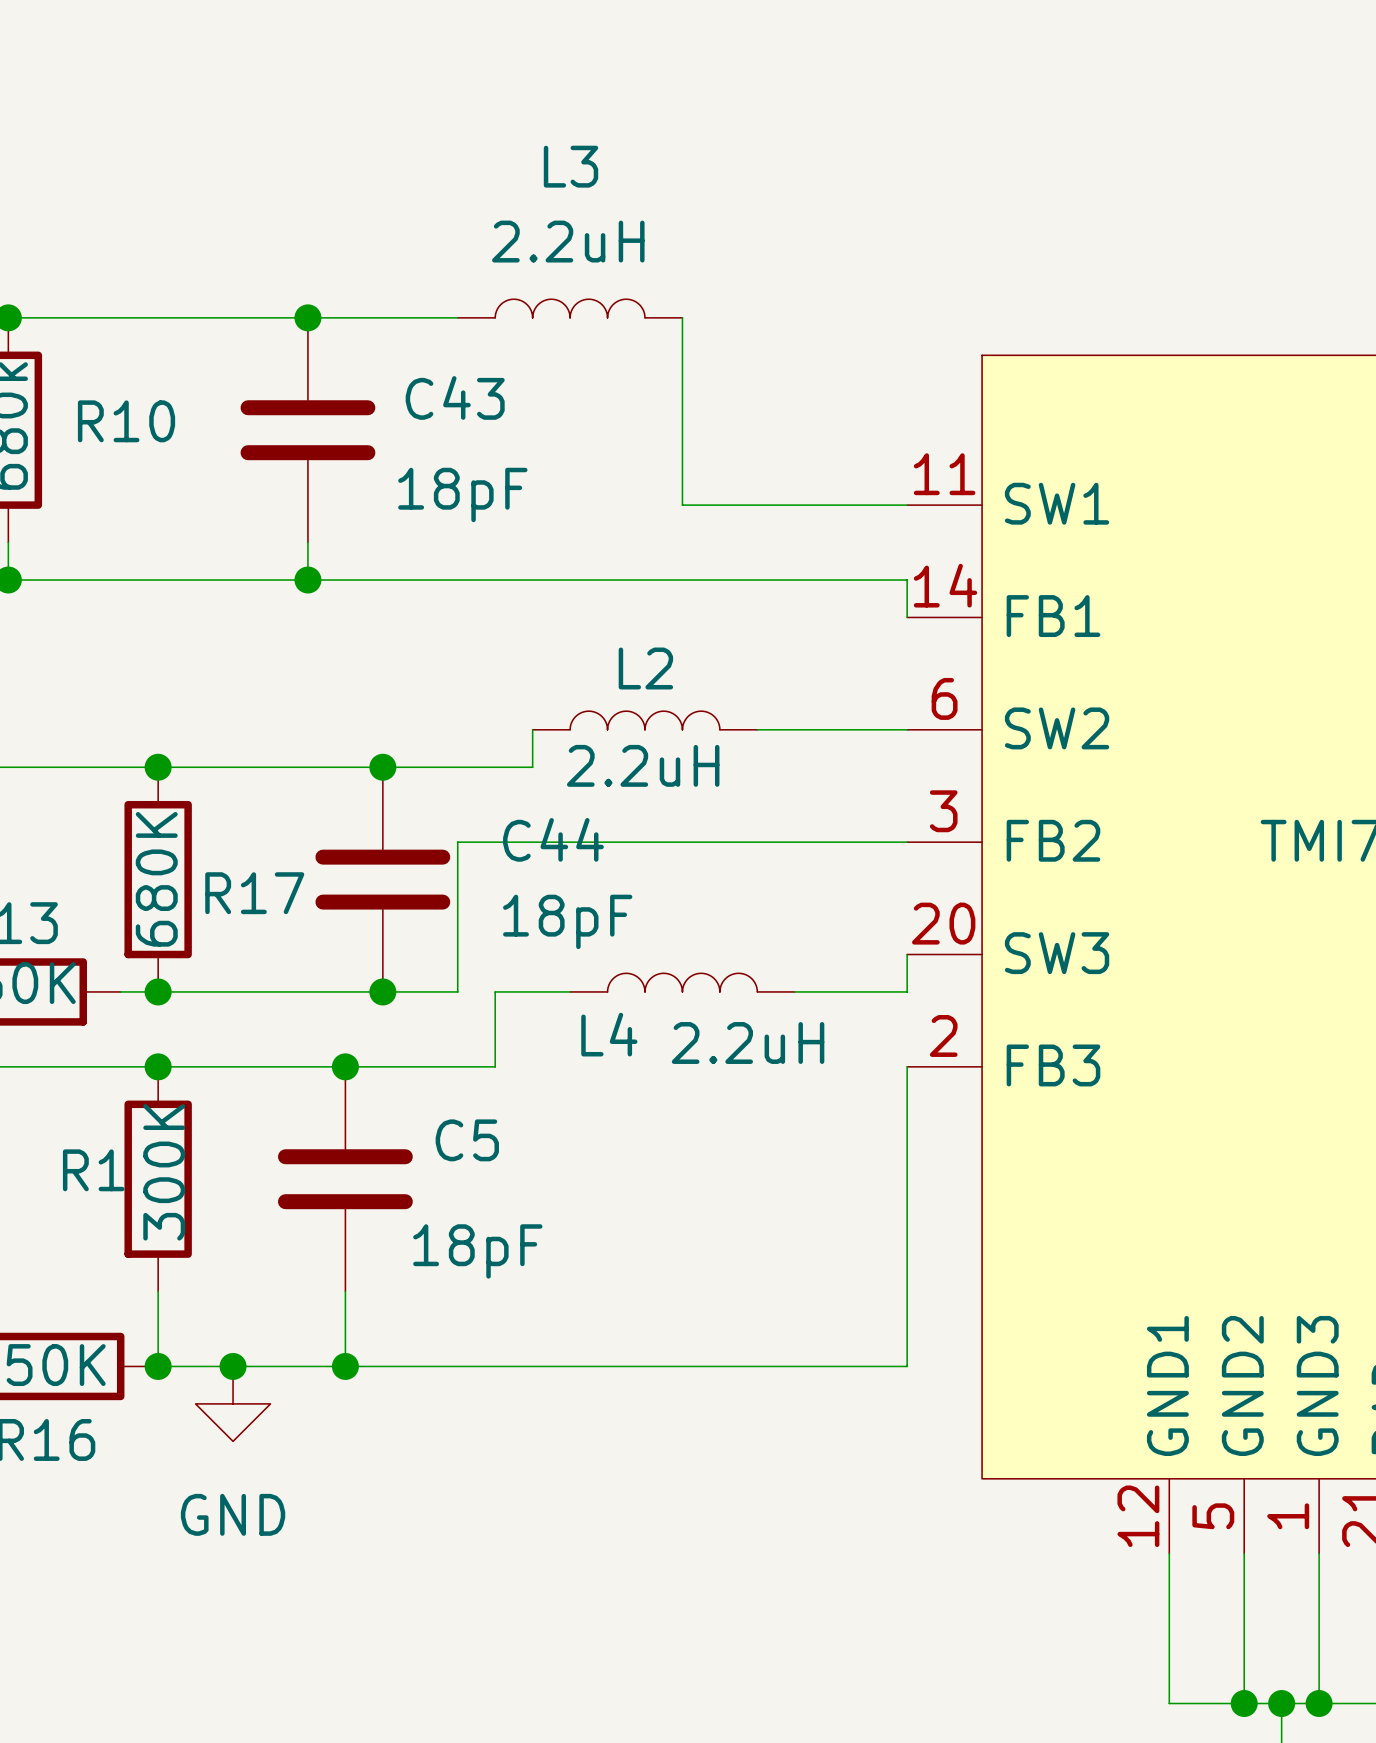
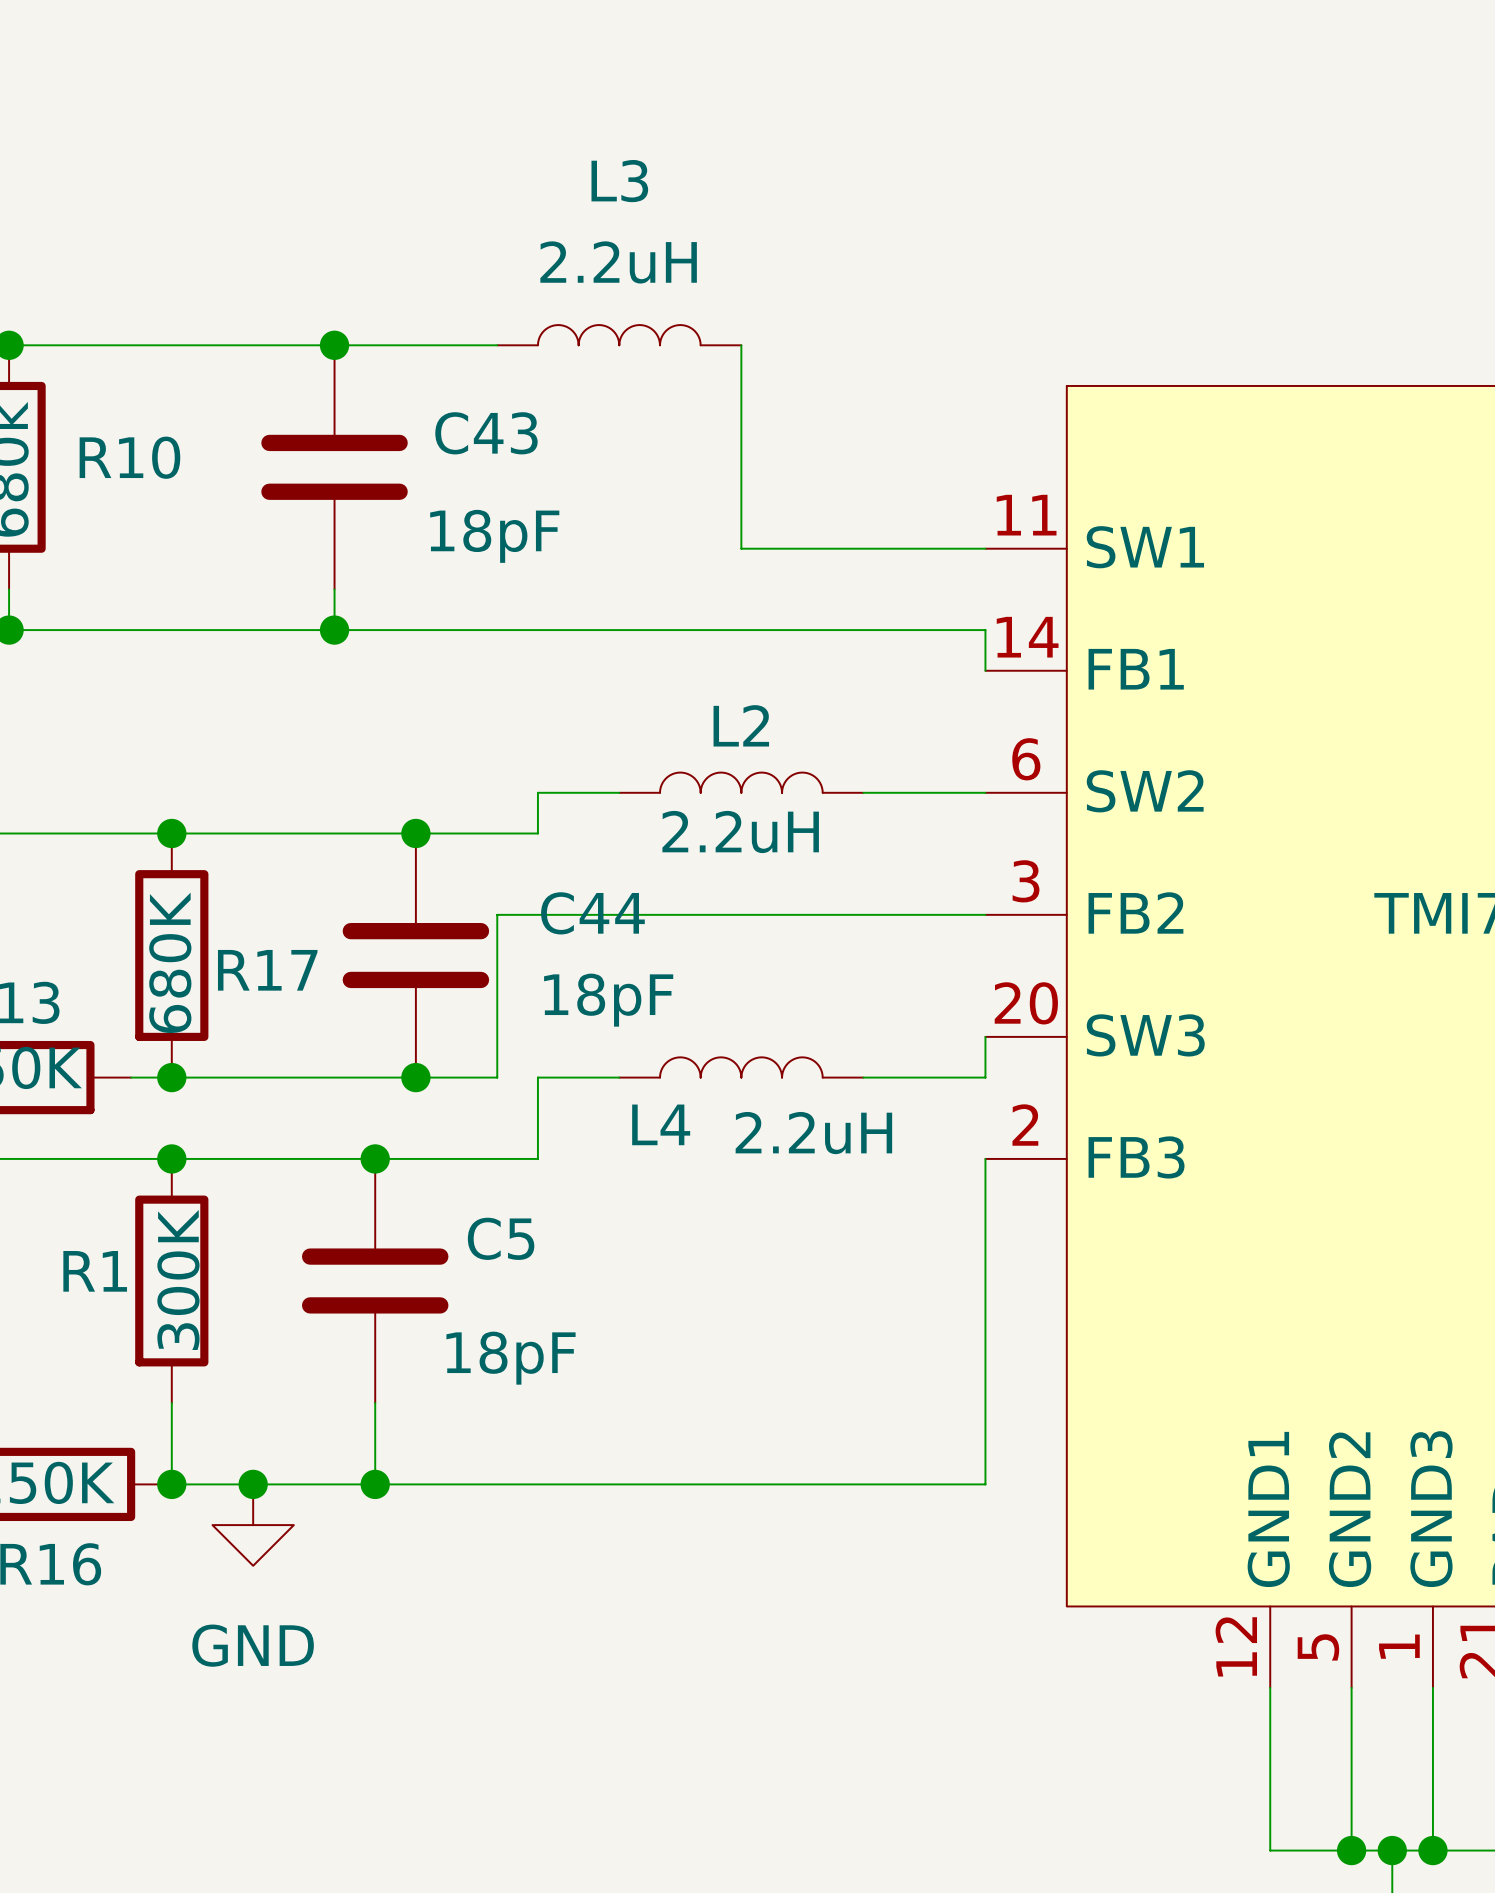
L2 position: (645, 720) -> (741, 782)
wire: (532, 729) (532, 767) (495, 767) -> (619, 792) (537, 792) (537, 833)

